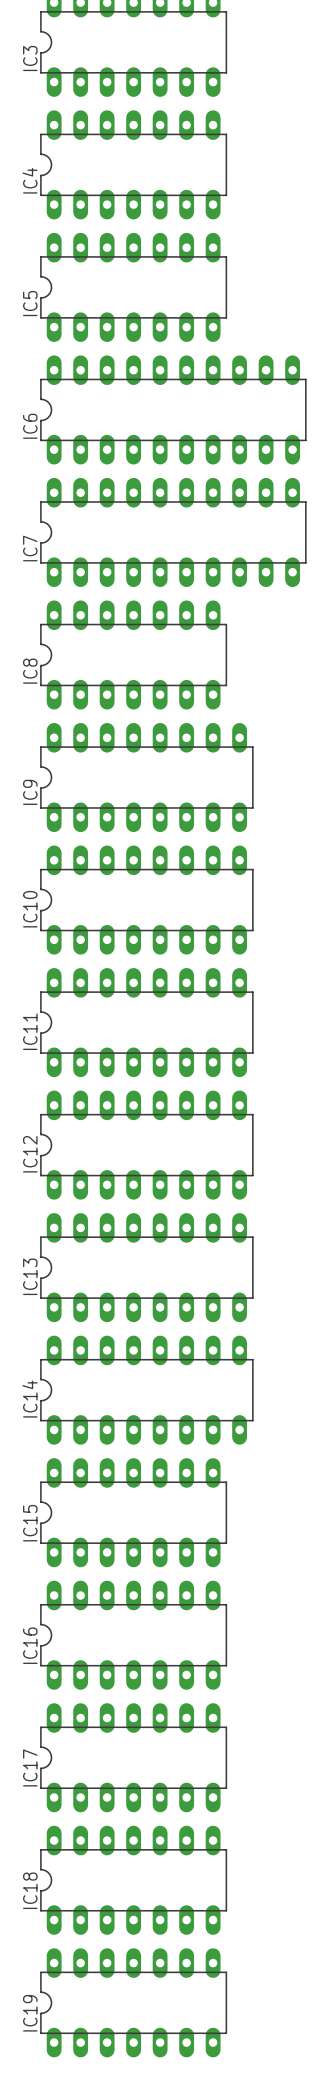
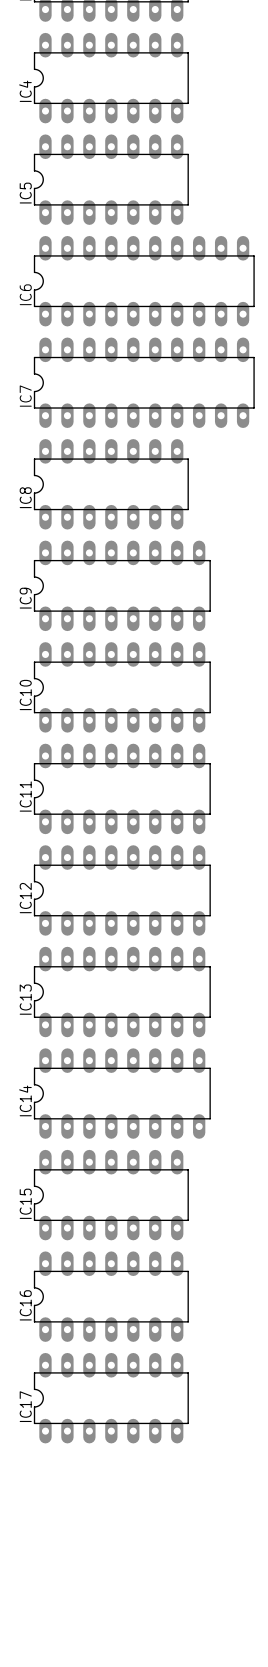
IC18: (133, 1880) -> none
IC19: (133, 2002) -> none

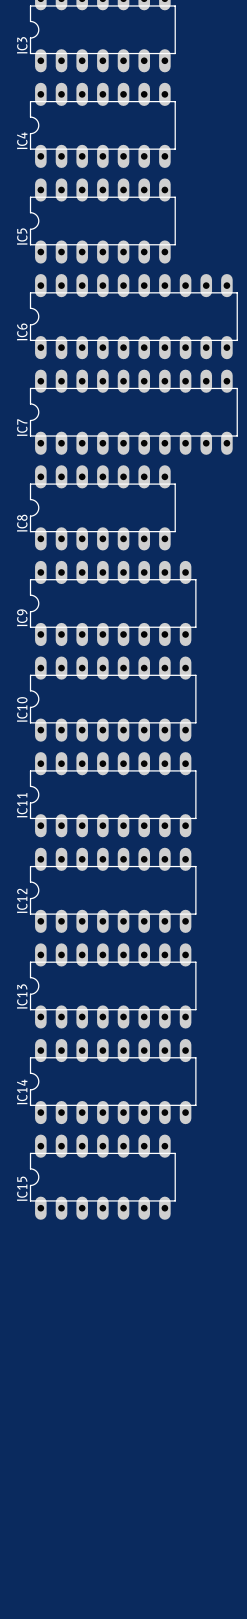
IC16: (111, 1296) -> none
IC17: (111, 1398) -> none

